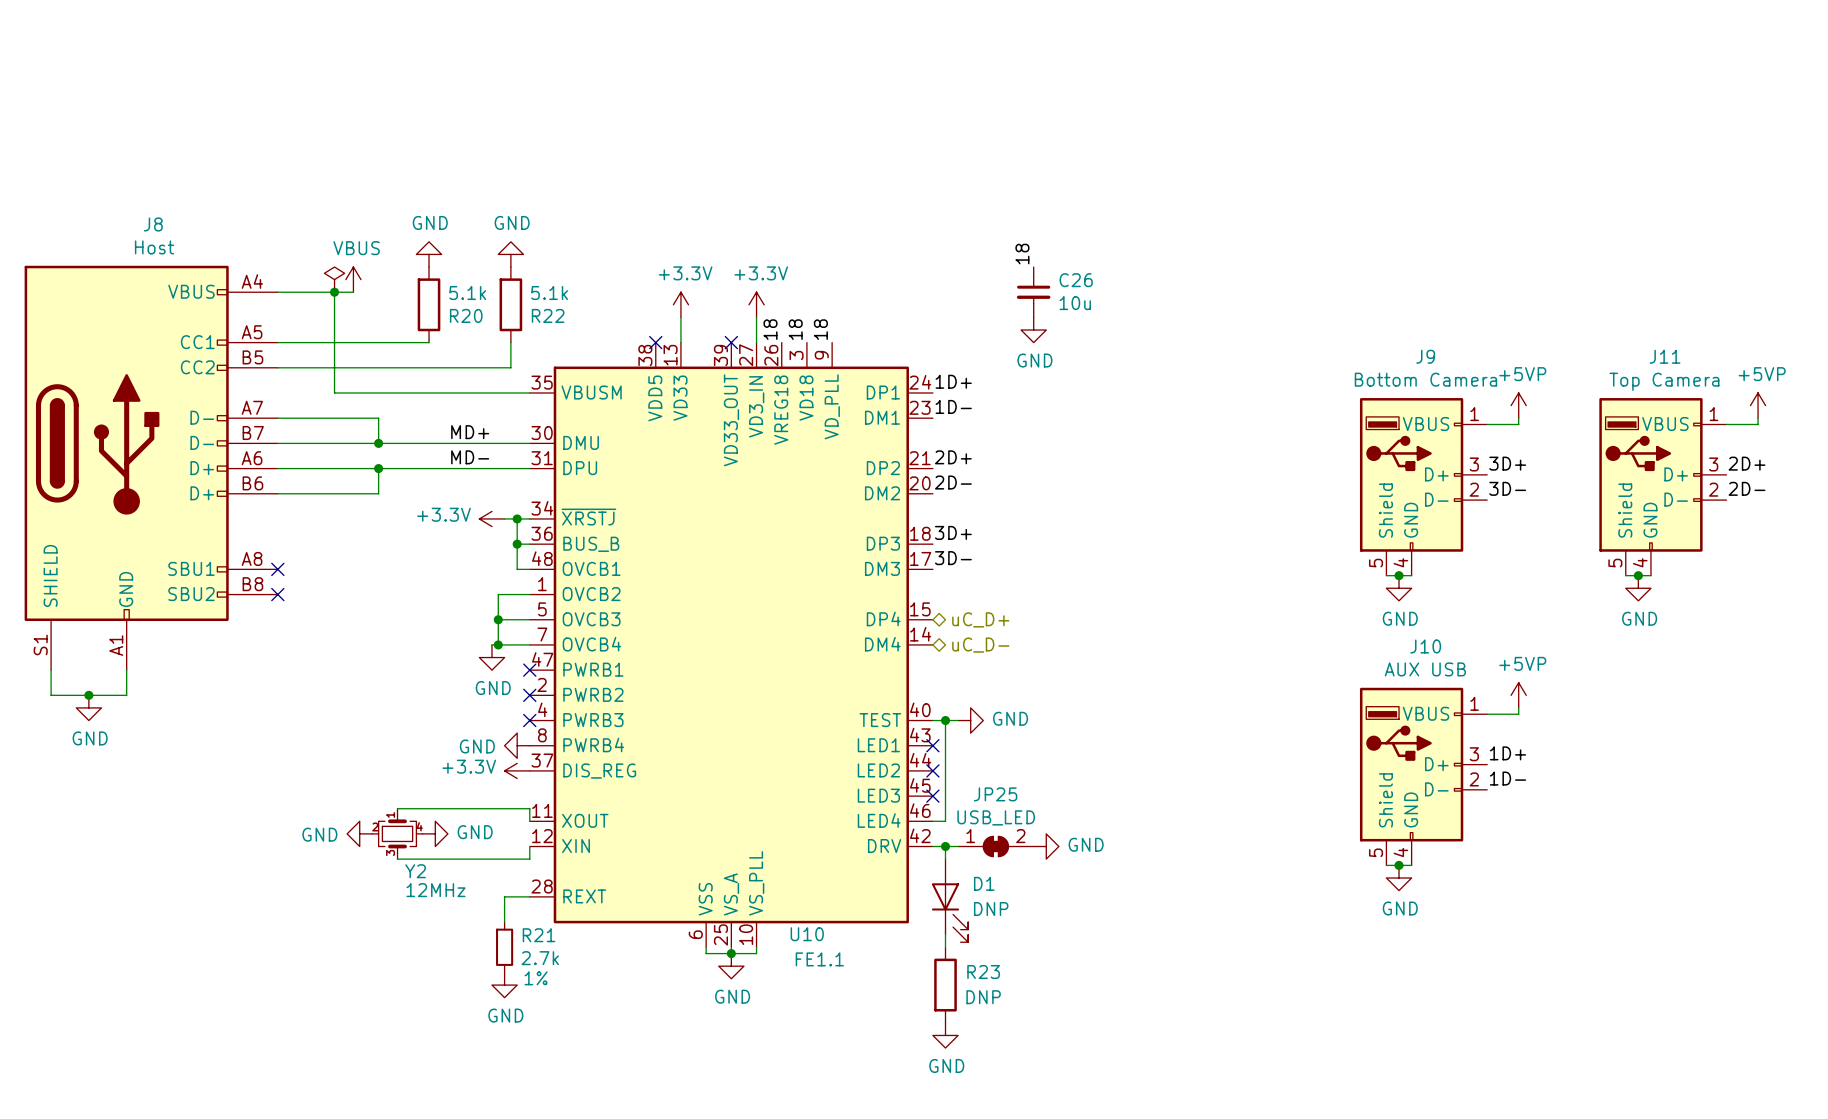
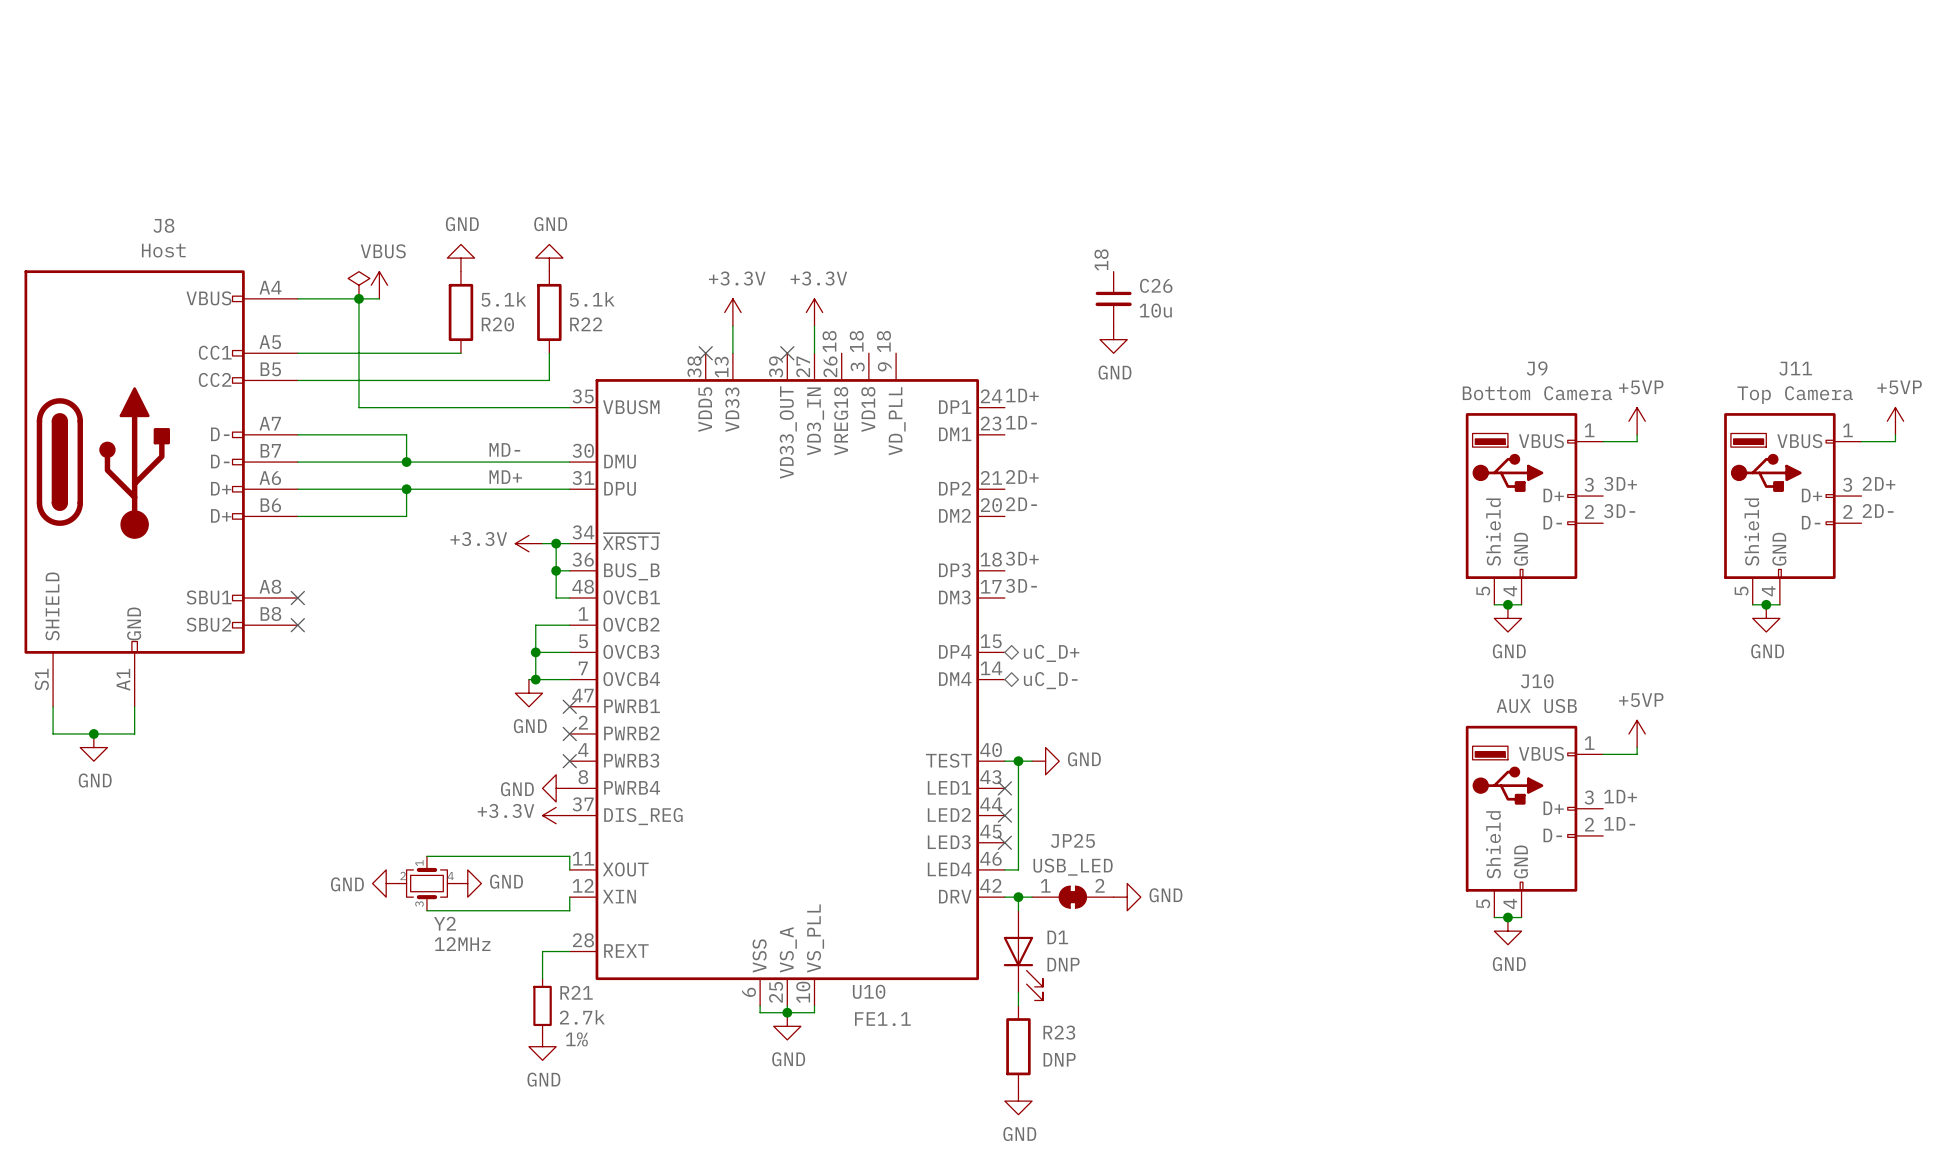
label: MD+ (470, 432) -> MD- (504, 449)
label: MD- (470, 457) -> MD+ (505, 477)

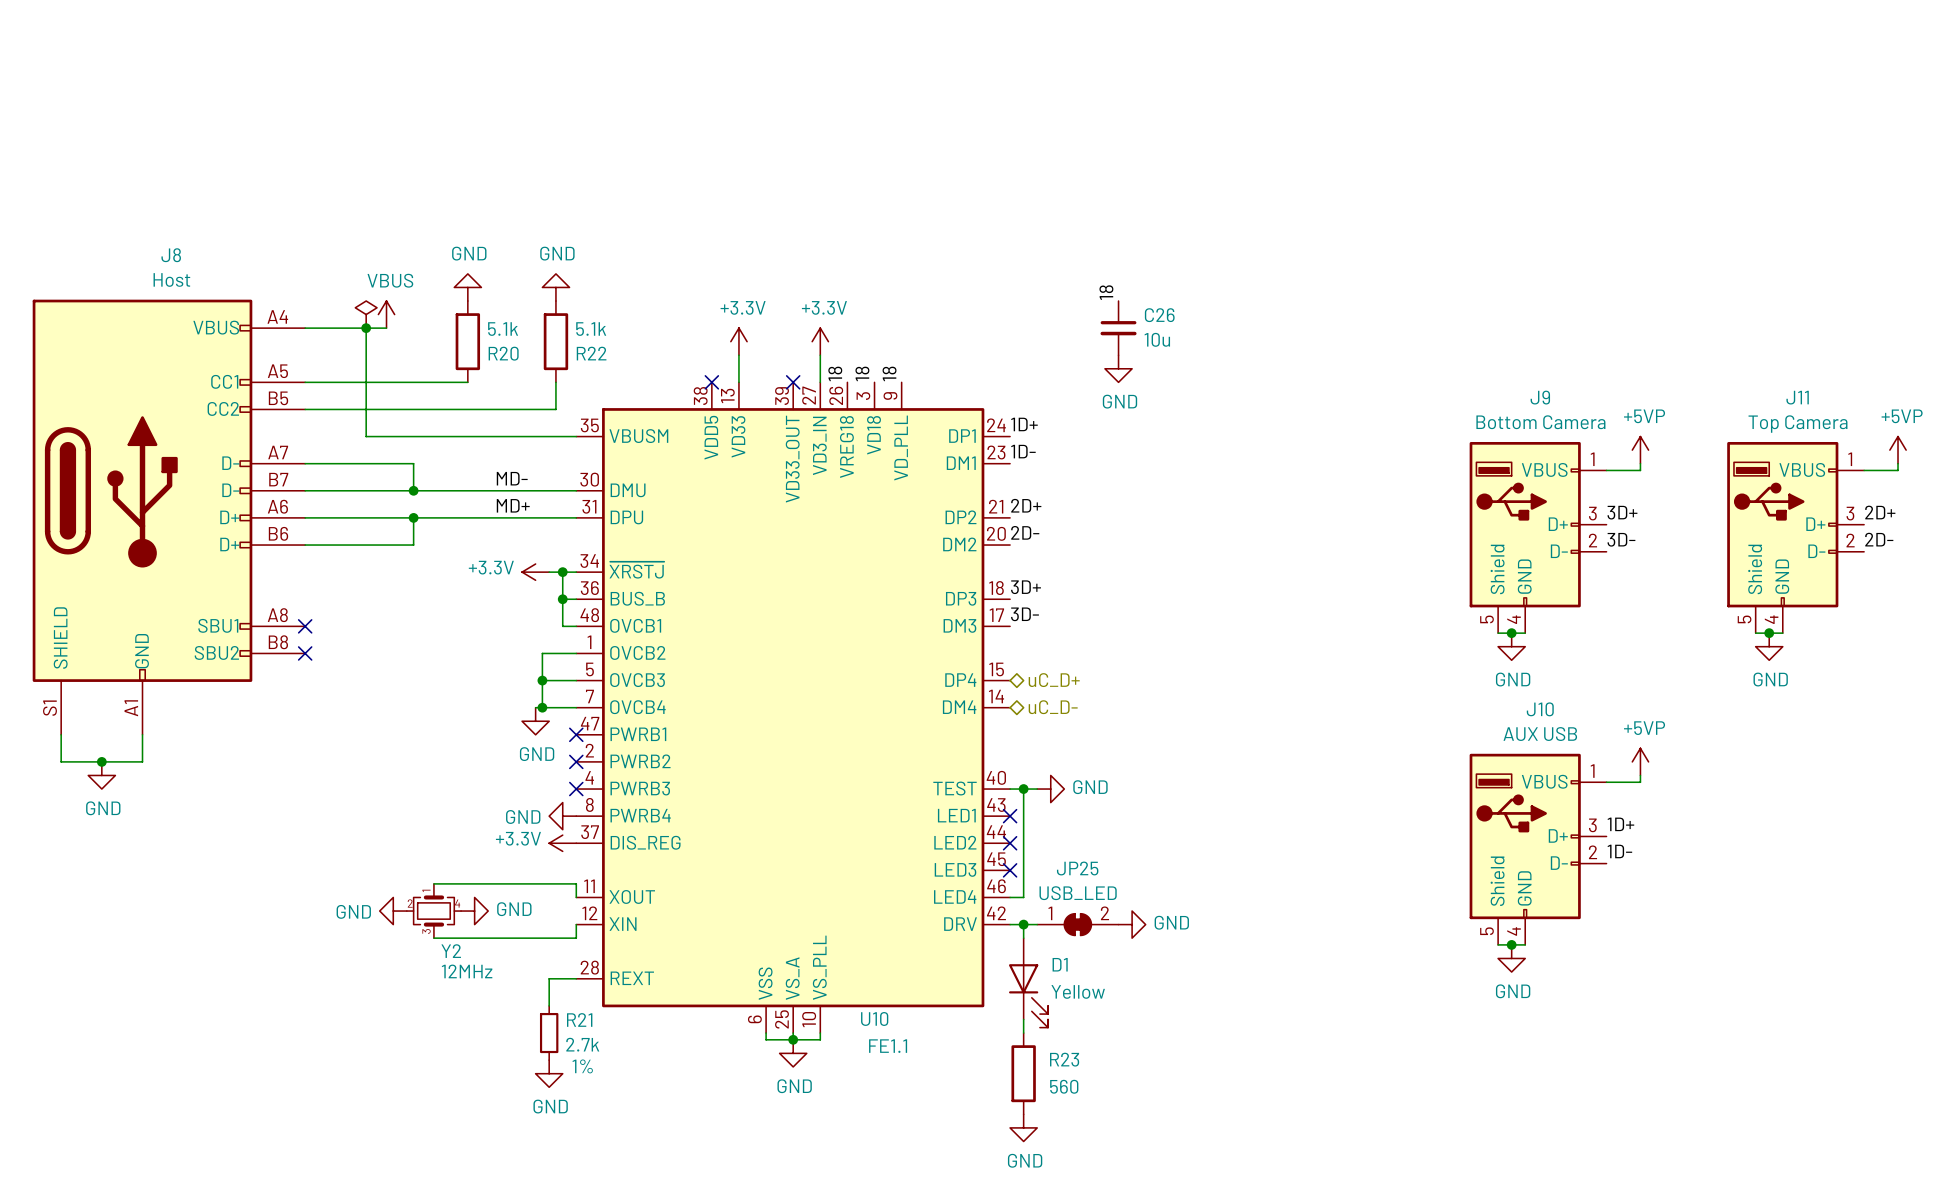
D1 value: DNP (1063, 964) -> Yellow (1078, 991)
R23 value: DNP (1059, 1059) -> 560 (1064, 1086)

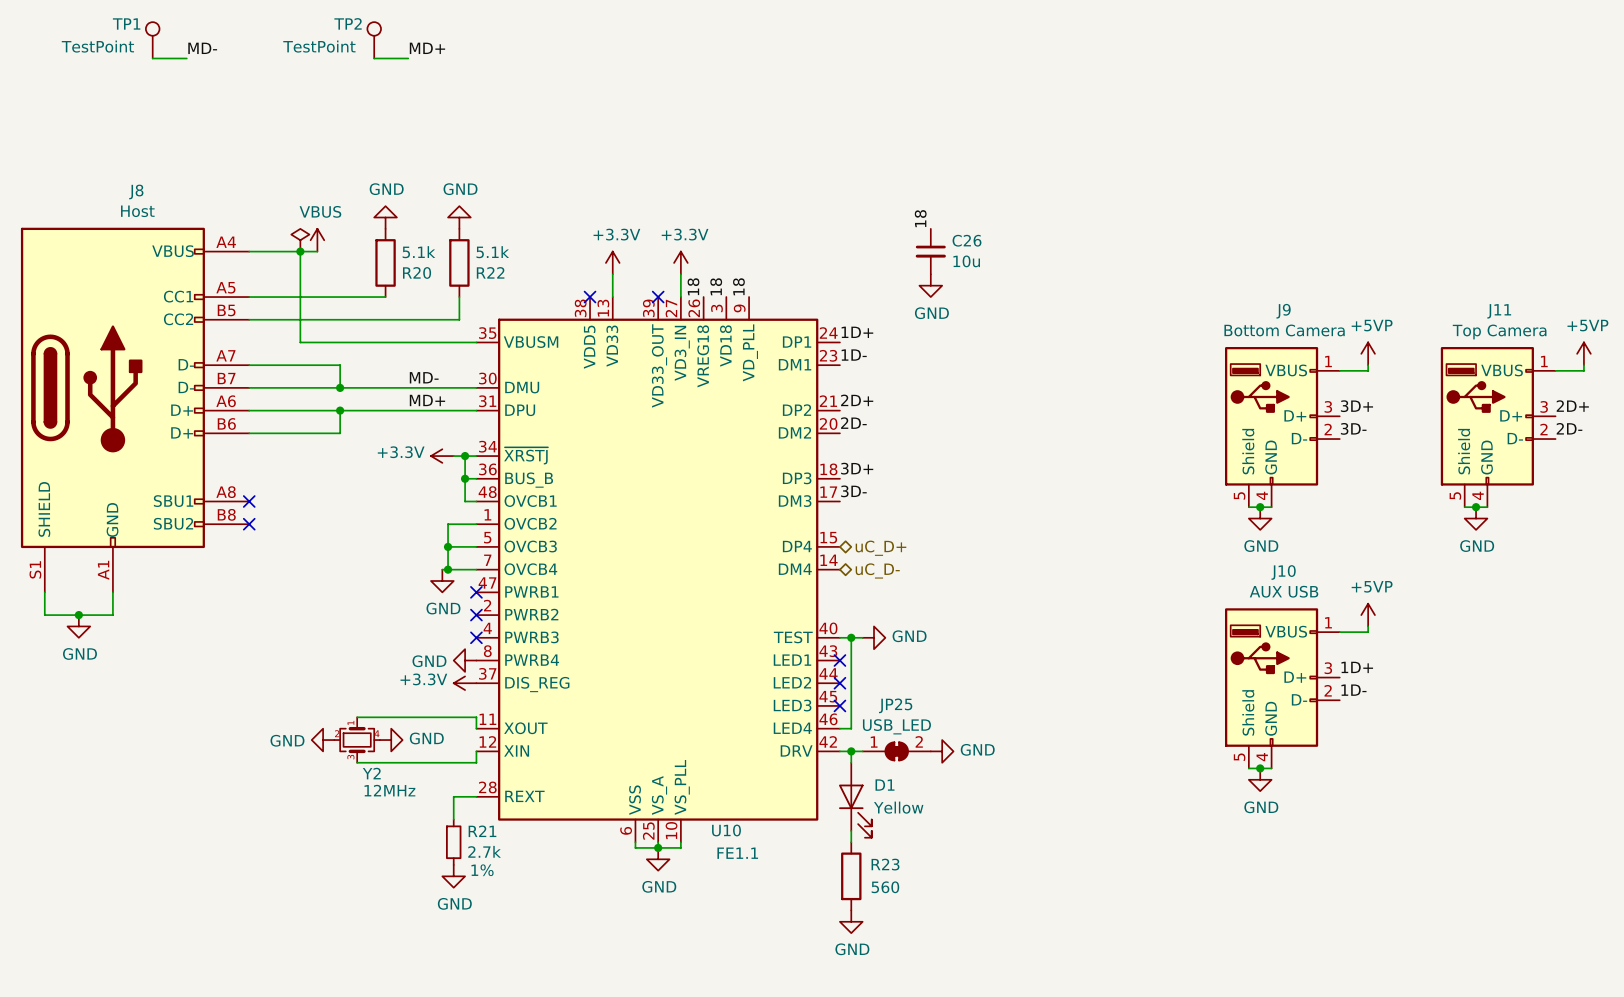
TP1: none -> TestPoint (152, 40)
TP2: none -> TestPoint (374, 40)
label: none -> MD- (202, 48)
label: none -> MD+ (427, 48)
wire: none -> (152, 58) (186, 58)
wire: none -> (374, 58) (408, 58)

